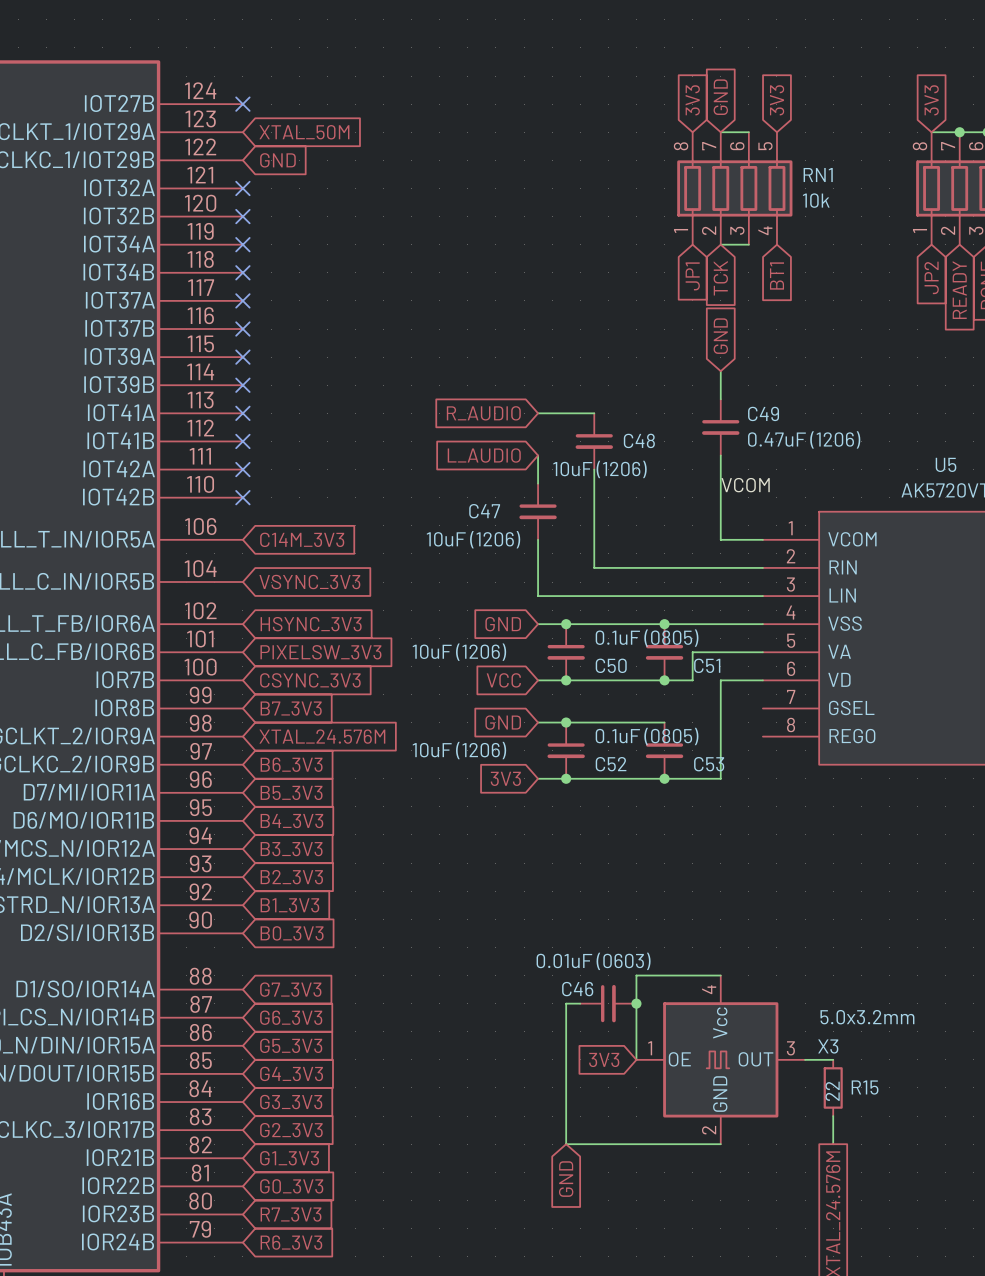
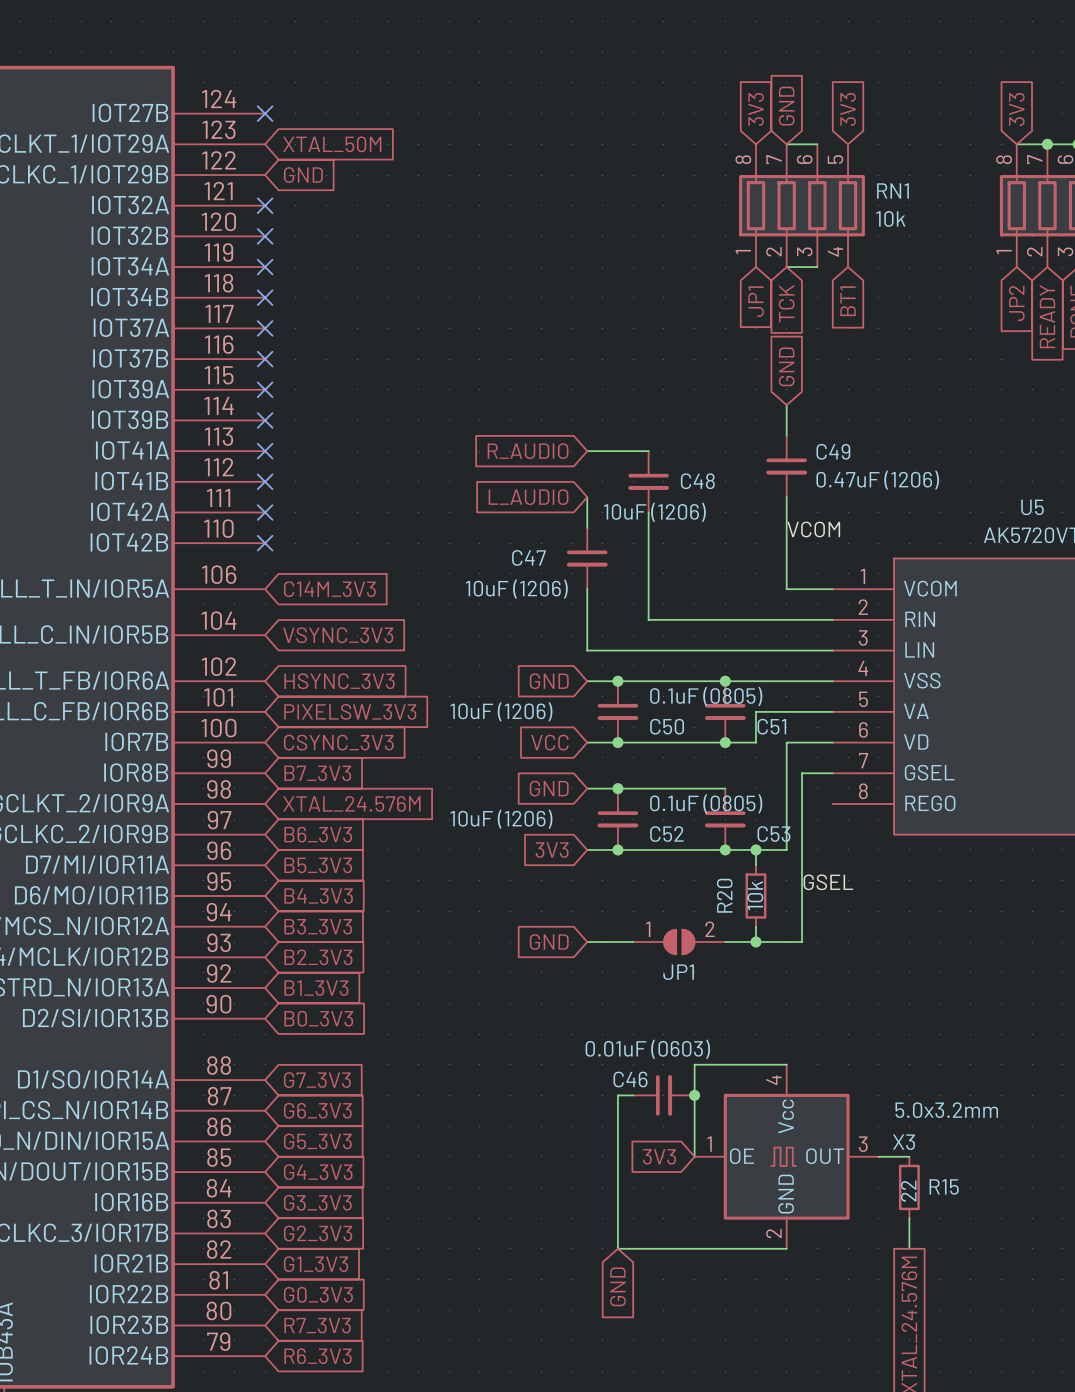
wire: none -> (832, 773) (802, 773) (802, 942) (725, 942)
wire: none -> (755, 849) (755, 865)
junction: none -> (755, 849)
label: none -> GSEL (828, 882)
R20: none -> 10k (755, 895)
wire: none -> (755, 926) (755, 942)
global label: none -> GND (549, 942)
wire: none -> (587, 942) (633, 942)
JP1: none -> (679, 942)
junction: none -> (755, 942)

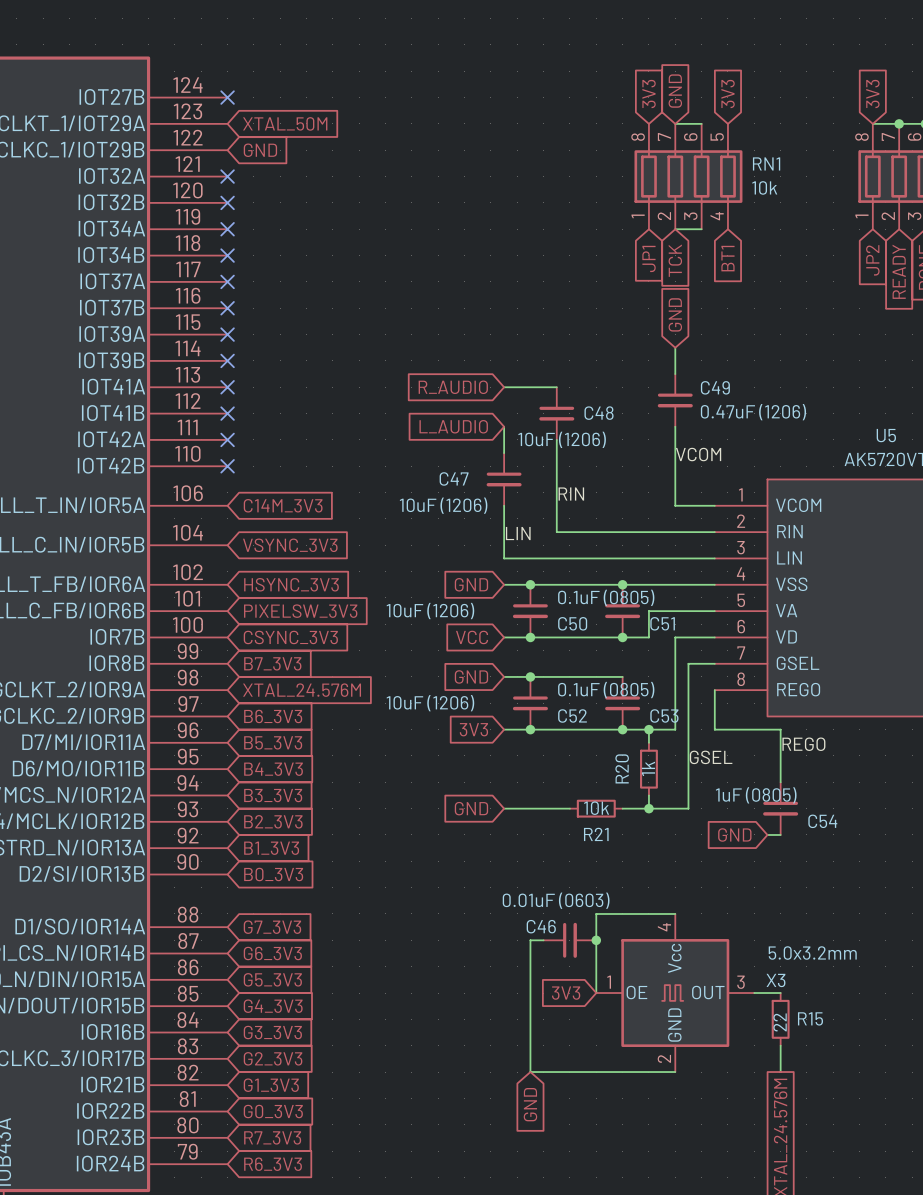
label: none -> RIN (571, 494)
label: none -> LIN (518, 533)
wire: none -> (714, 690) (714, 729) (780, 729) (780, 782)
label: none -> REGO (803, 744)
R20 value: 10k (755, 895) -> 1k (648, 768)
JP1: (679, 942) -> none
R21: none -> 10k (596, 808)
C54: none -> 1uF (0805) (780, 808)
global label: none -> GND (734, 834)
wire: none -> (767, 834) (780, 834)

